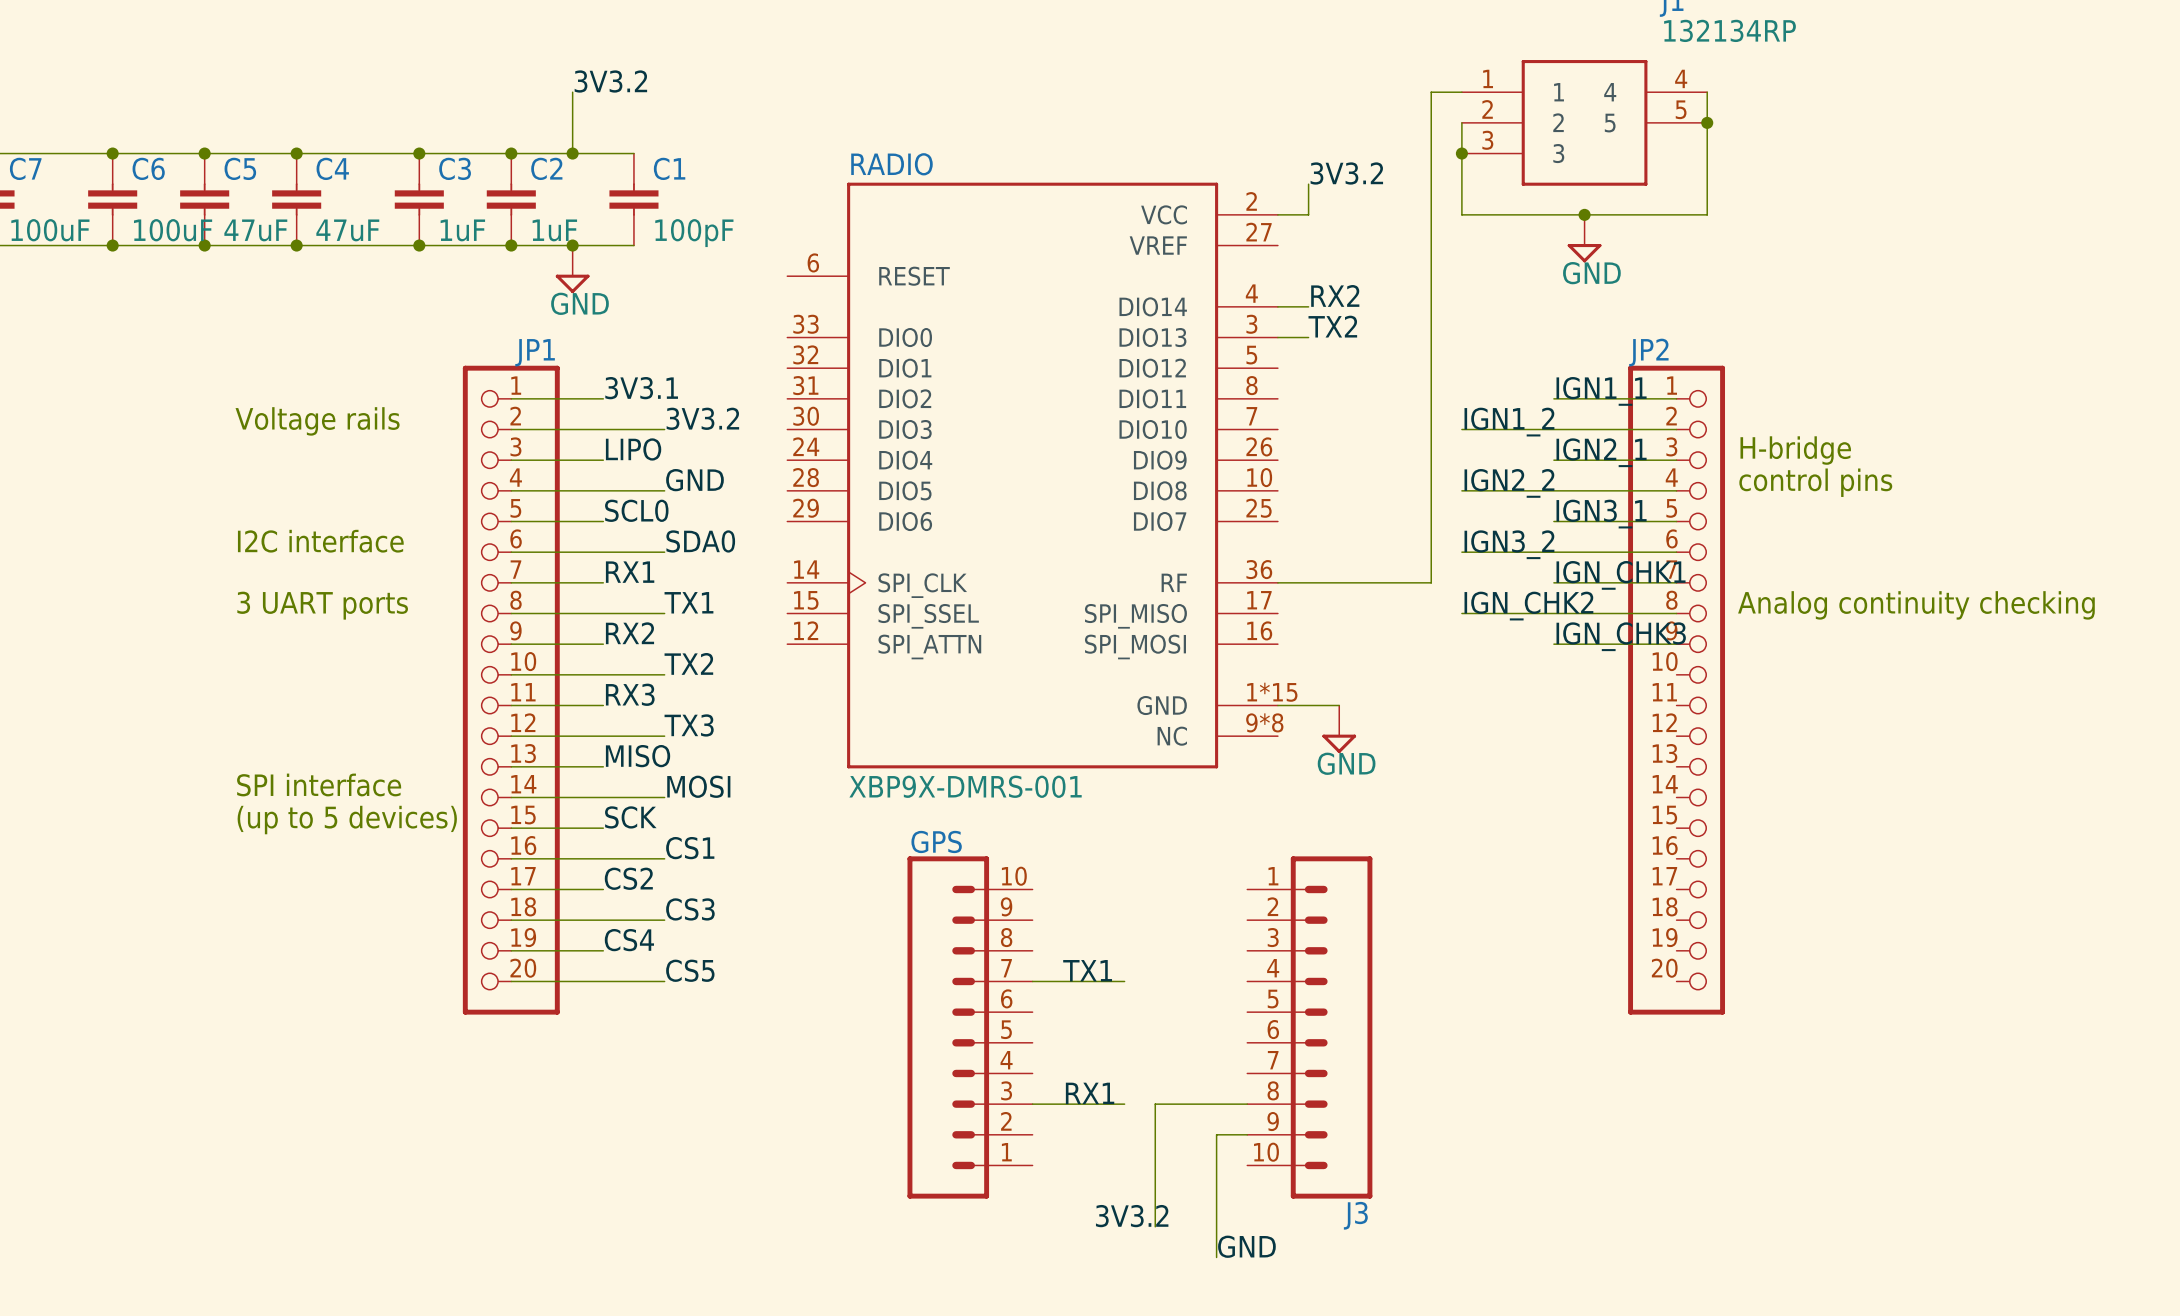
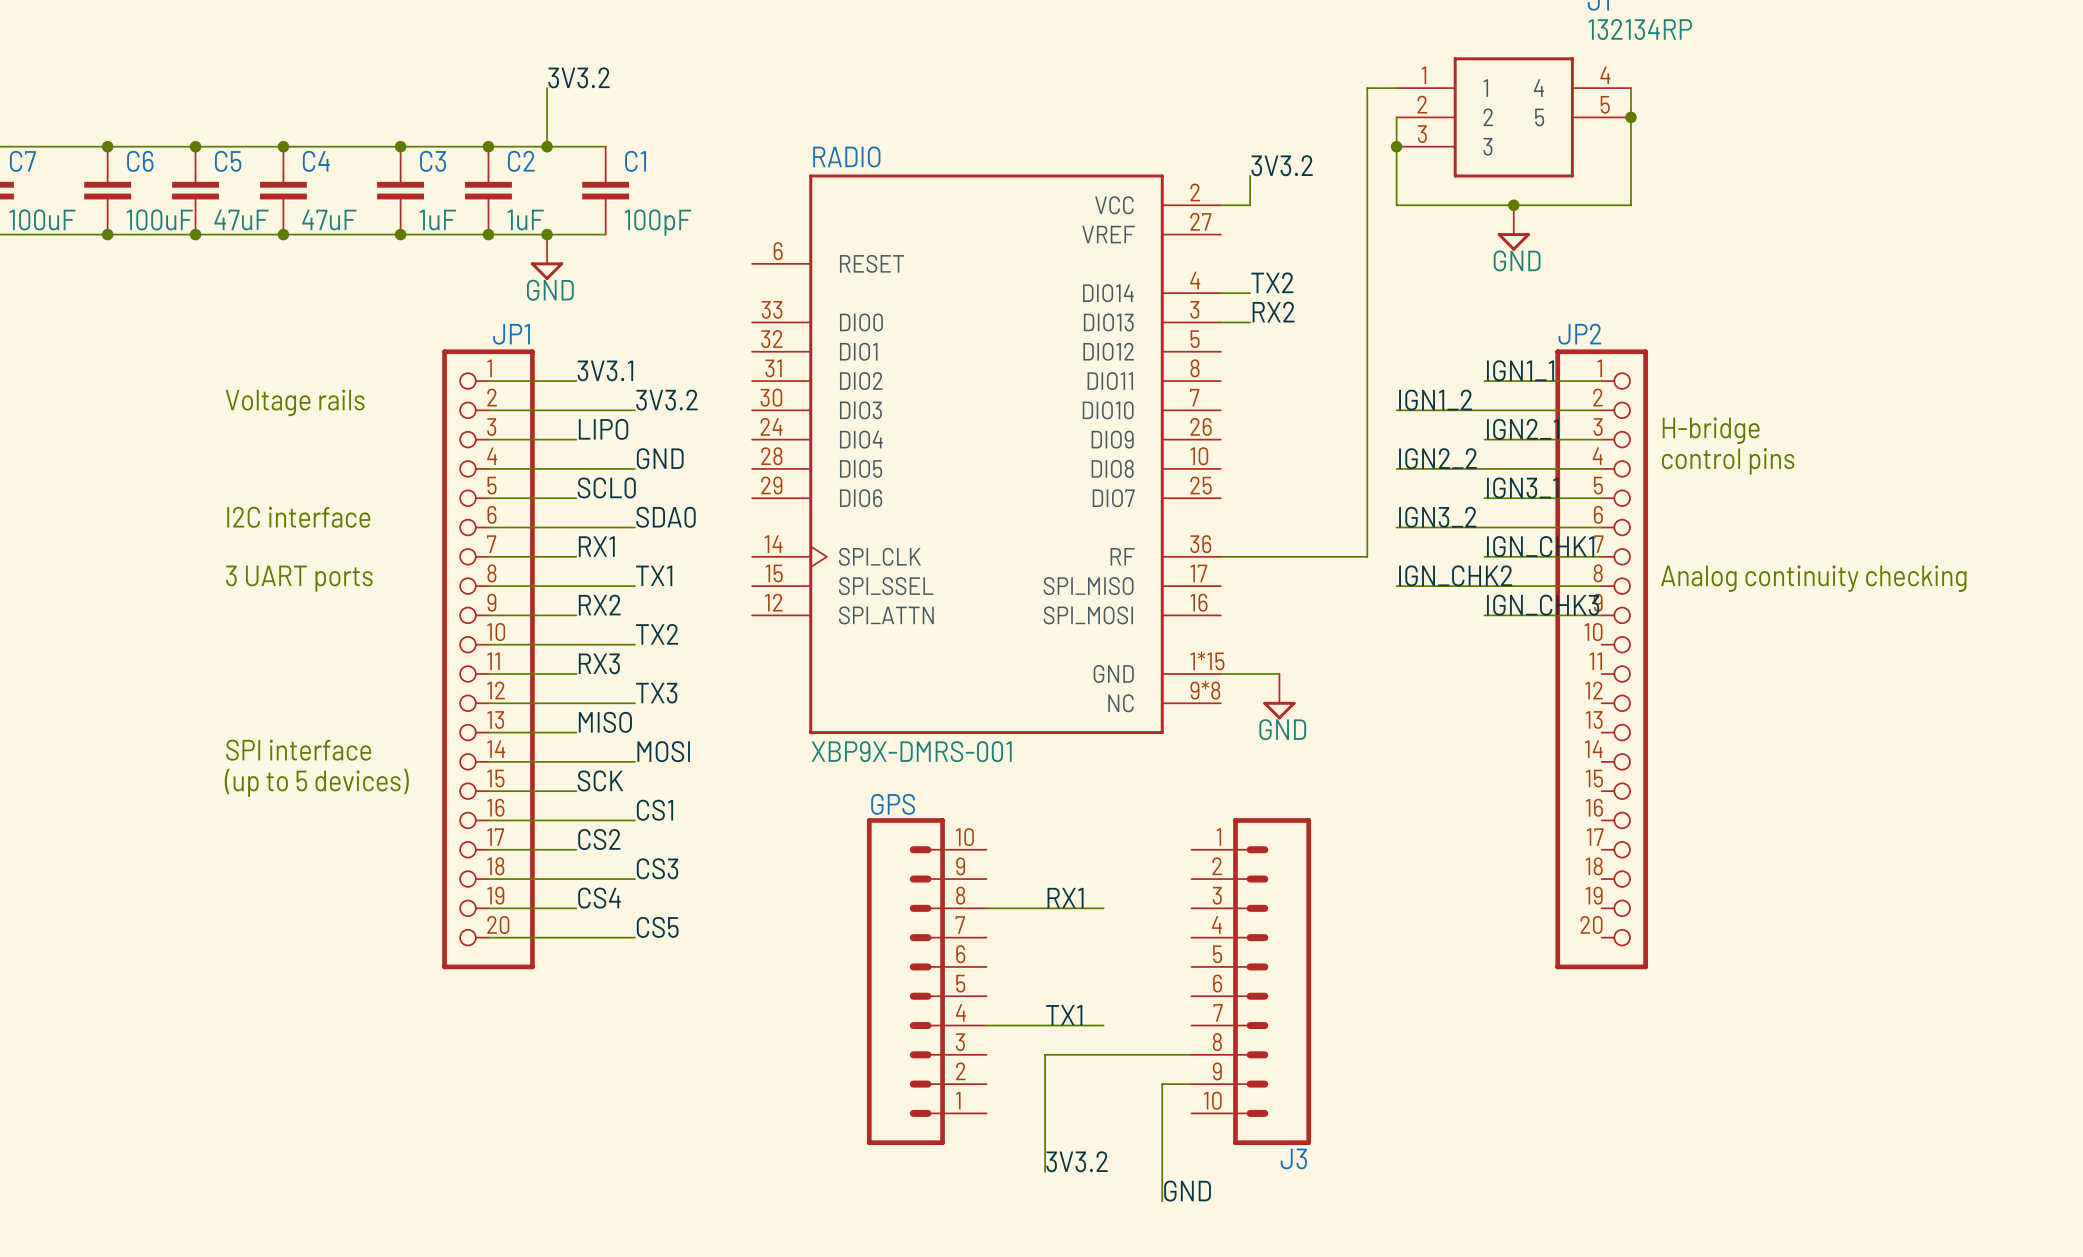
label: RX2 (1335, 295) -> TX2 (1272, 282)
label: TX2 (1332, 326) -> RX2 (1273, 312)
wire: none -> (986, 908) (1103, 908)
label position: TX1 (1087, 970) -> TX1 (1064, 1015)
wire: (1032, 981) (1124, 981) -> none
wire: none -> (986, 1025) (1103, 1025)
label position: RX1 (1090, 1093) -> RX1 (1065, 898)
wire: (1032, 1104) (1093, 1104) -> (1045, 1172) (1045, 1054)
wire: (1155, 1104) (1155, 1226) -> (1103, 1054) (1074, 1054)

